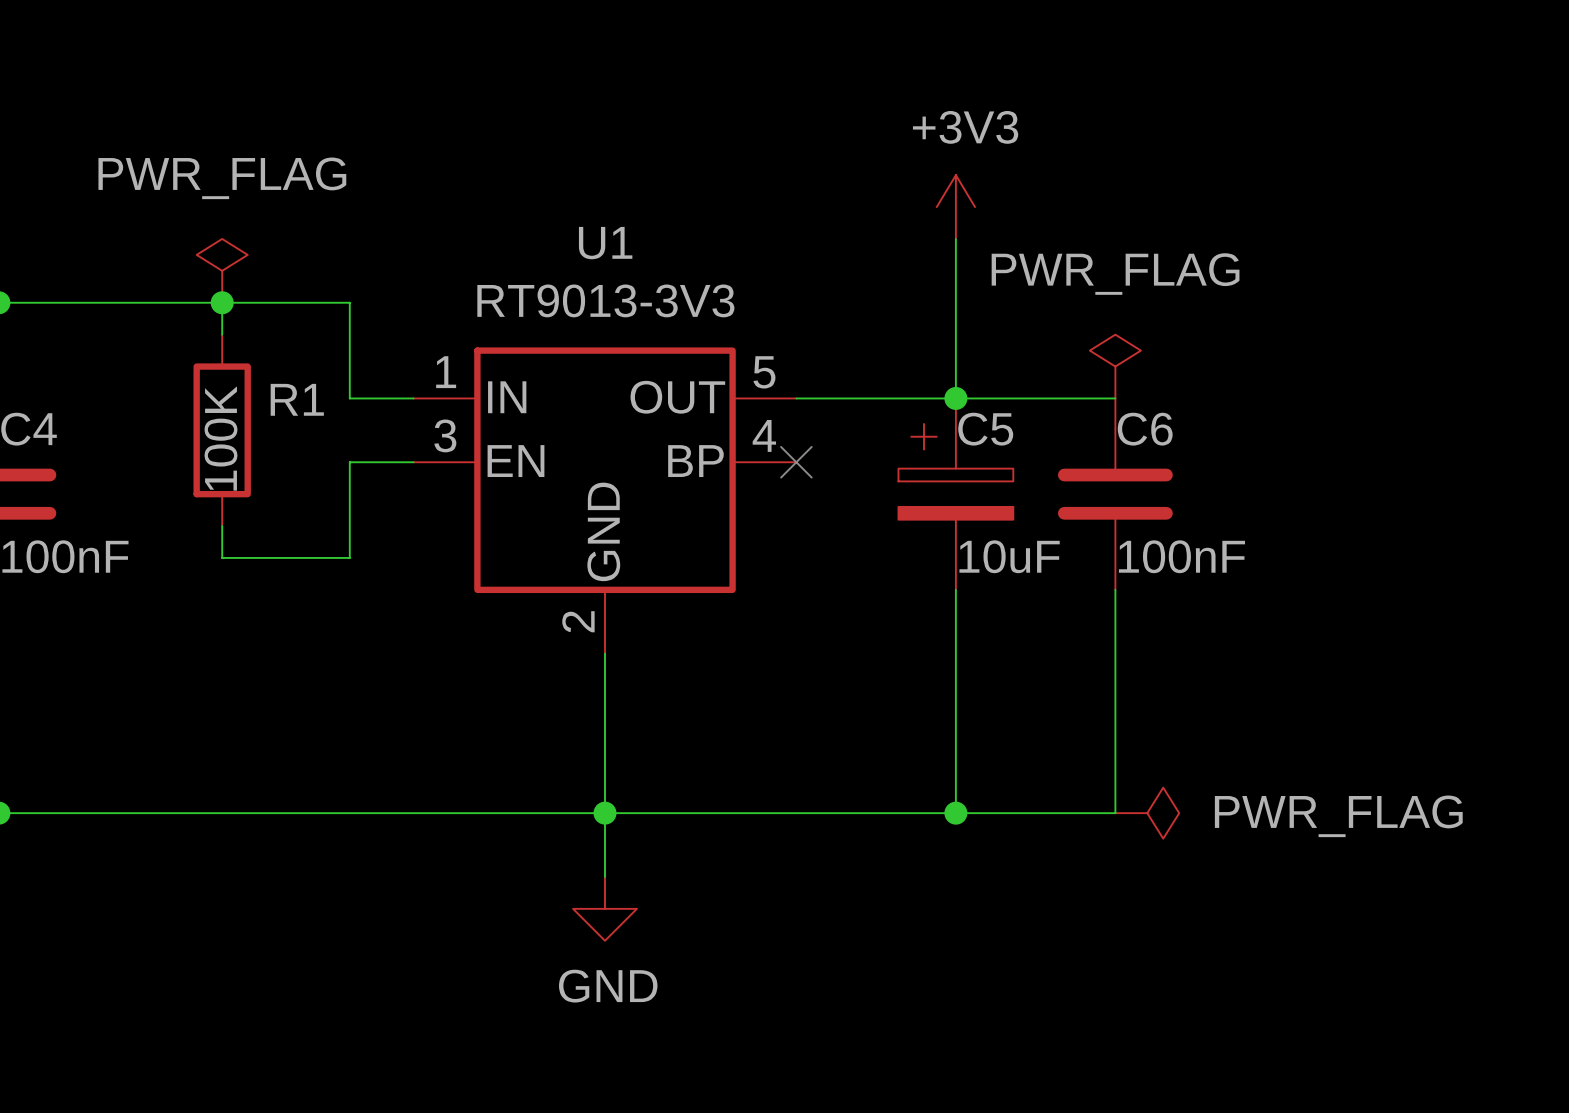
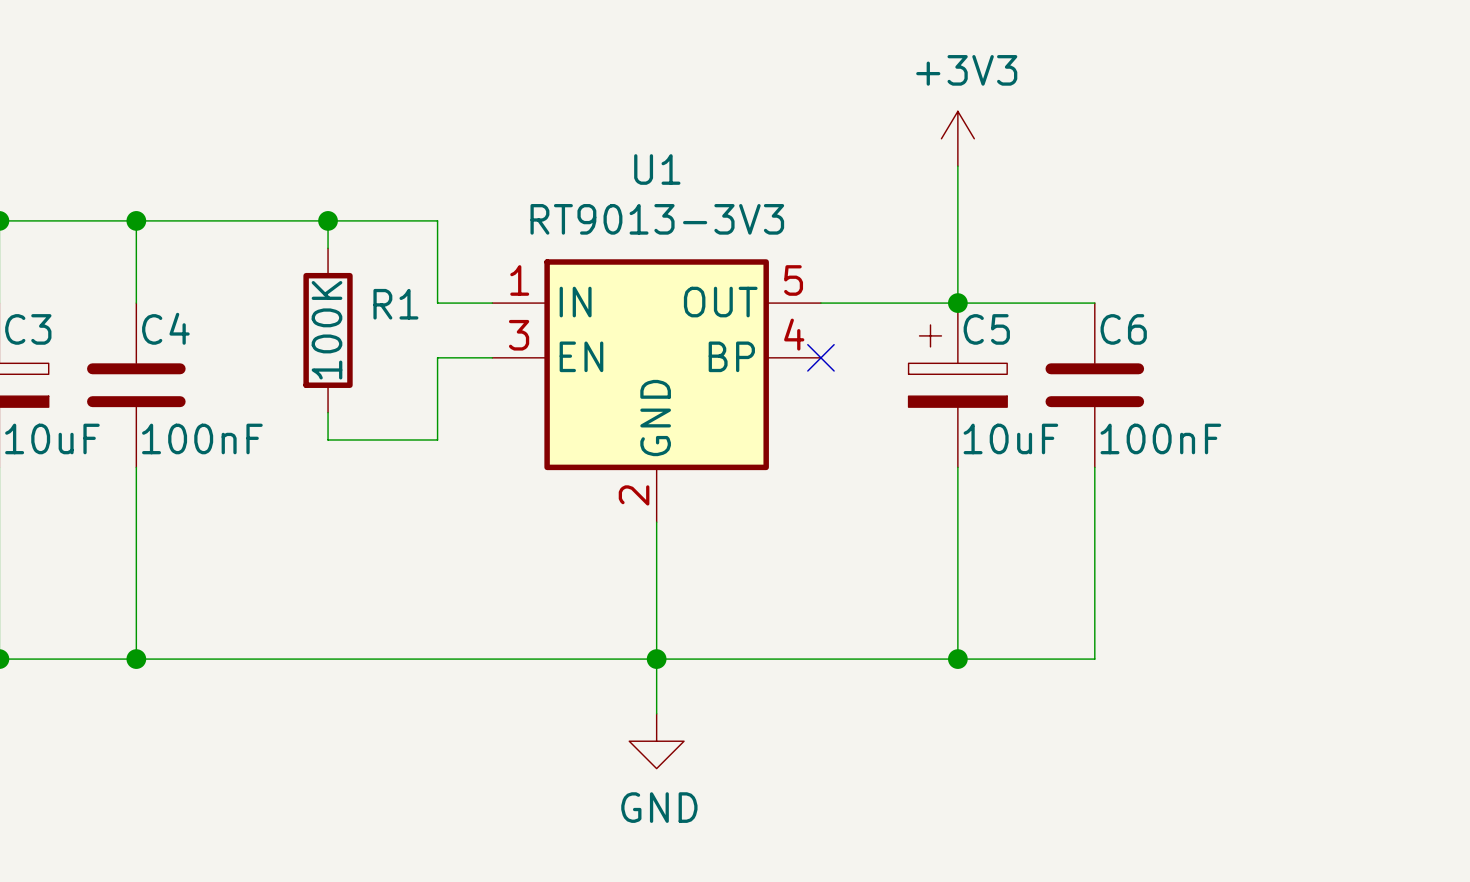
power symbol: PWR_FLAG (222, 270) -> none
power symbol: PWR_FLAG (1115, 366) -> none
power symbol: PWR_FLAG (1147, 813) -> none

